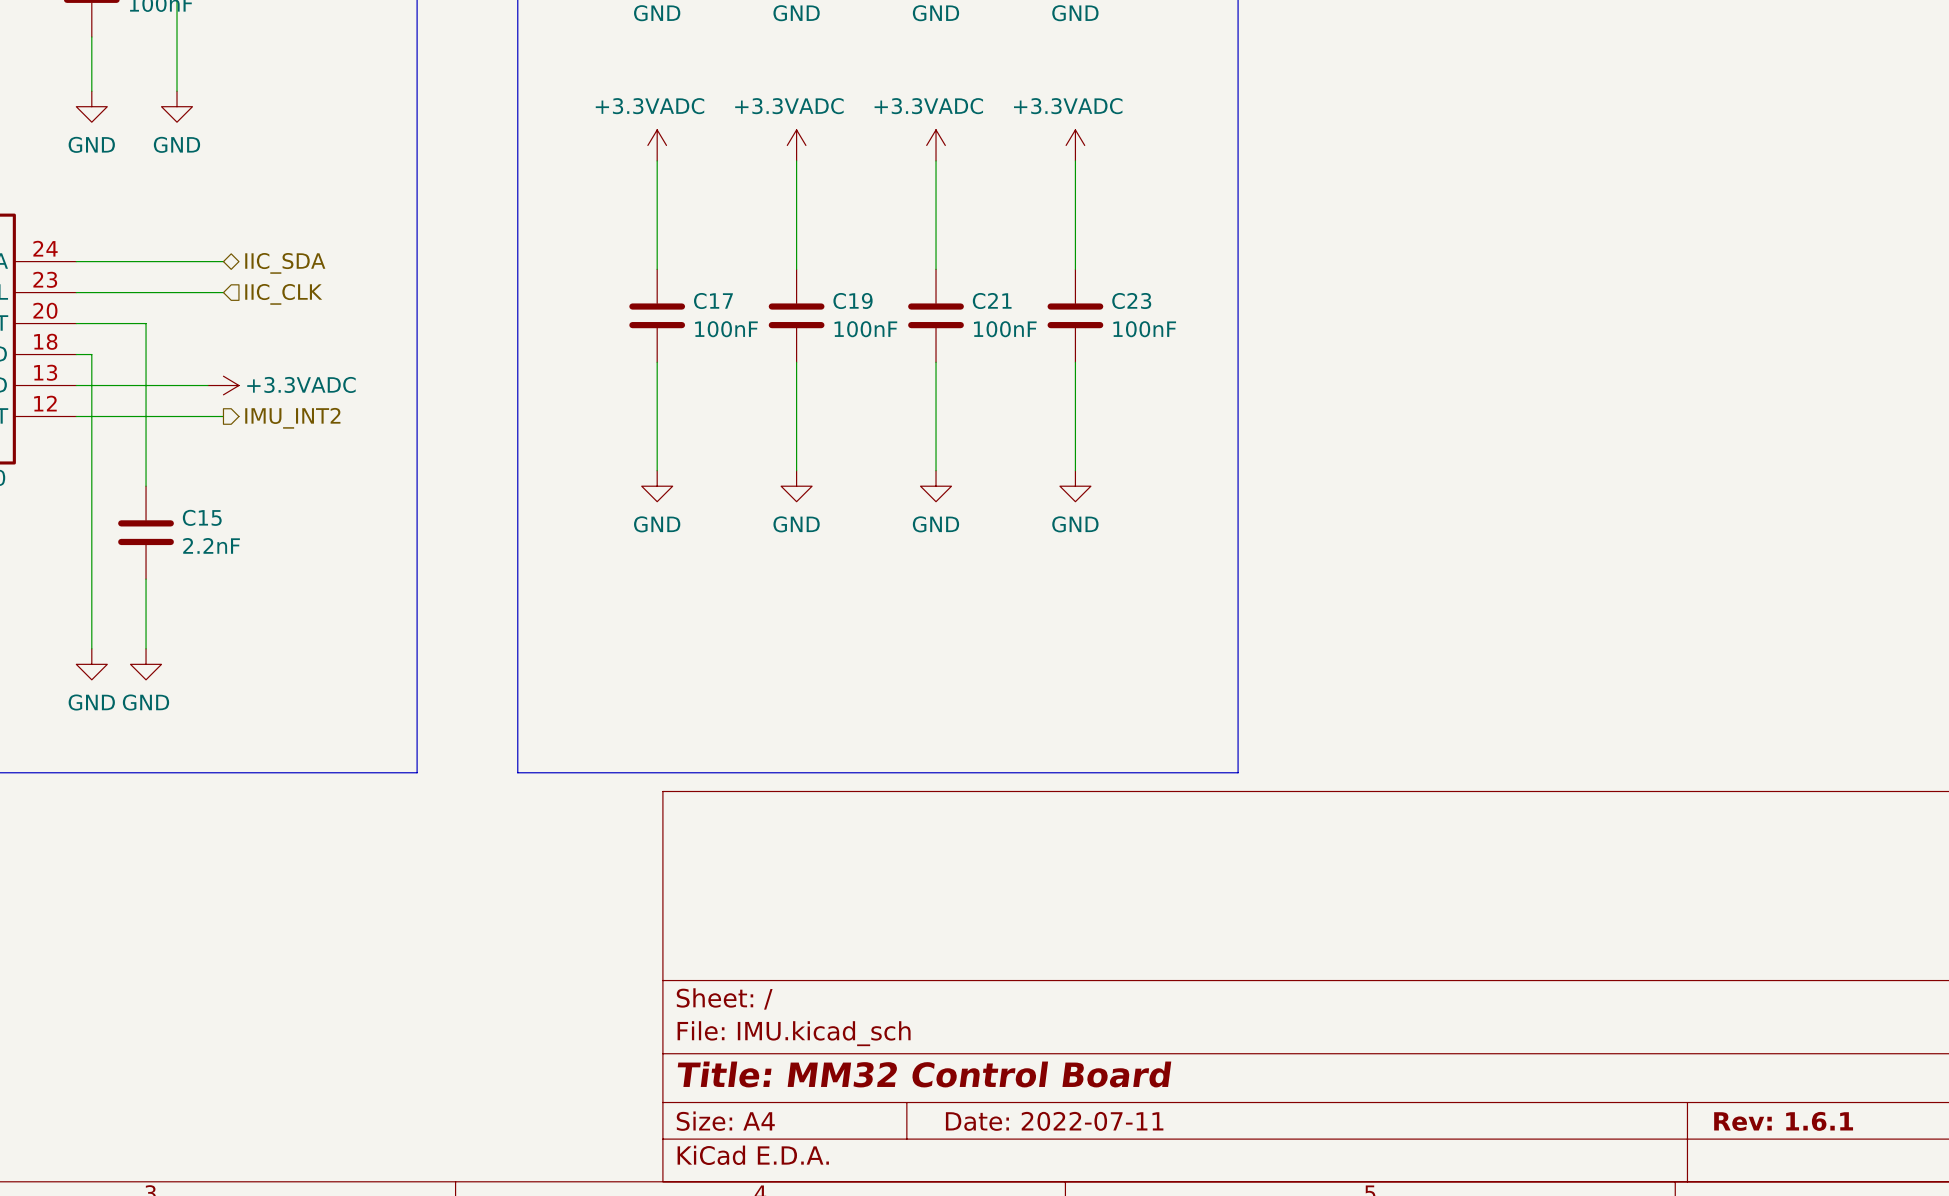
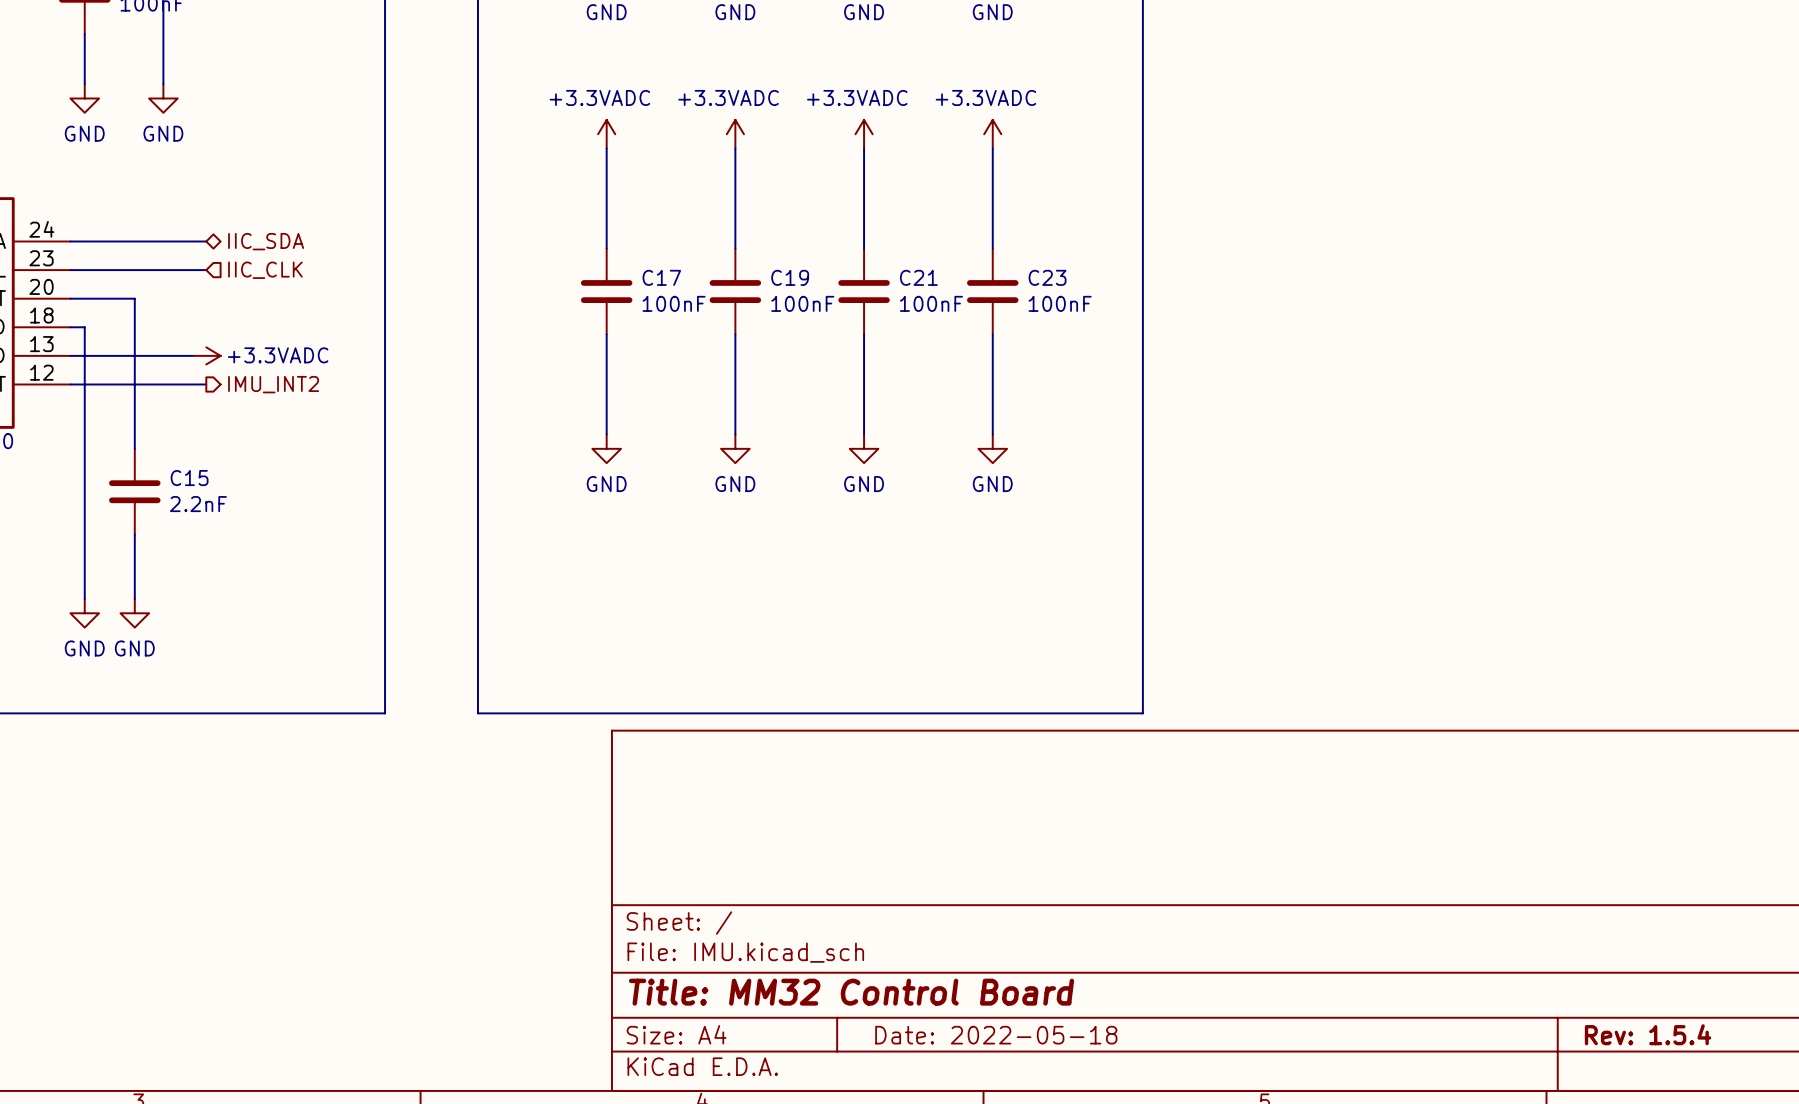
title block: Date: 2022-07-11 (1054, 1121) -> Date: 2022-05-18 (996, 1035)
title block: Rev: 1.6.1 (1783, 1121) -> Rev: 1.5.4 (1648, 1034)

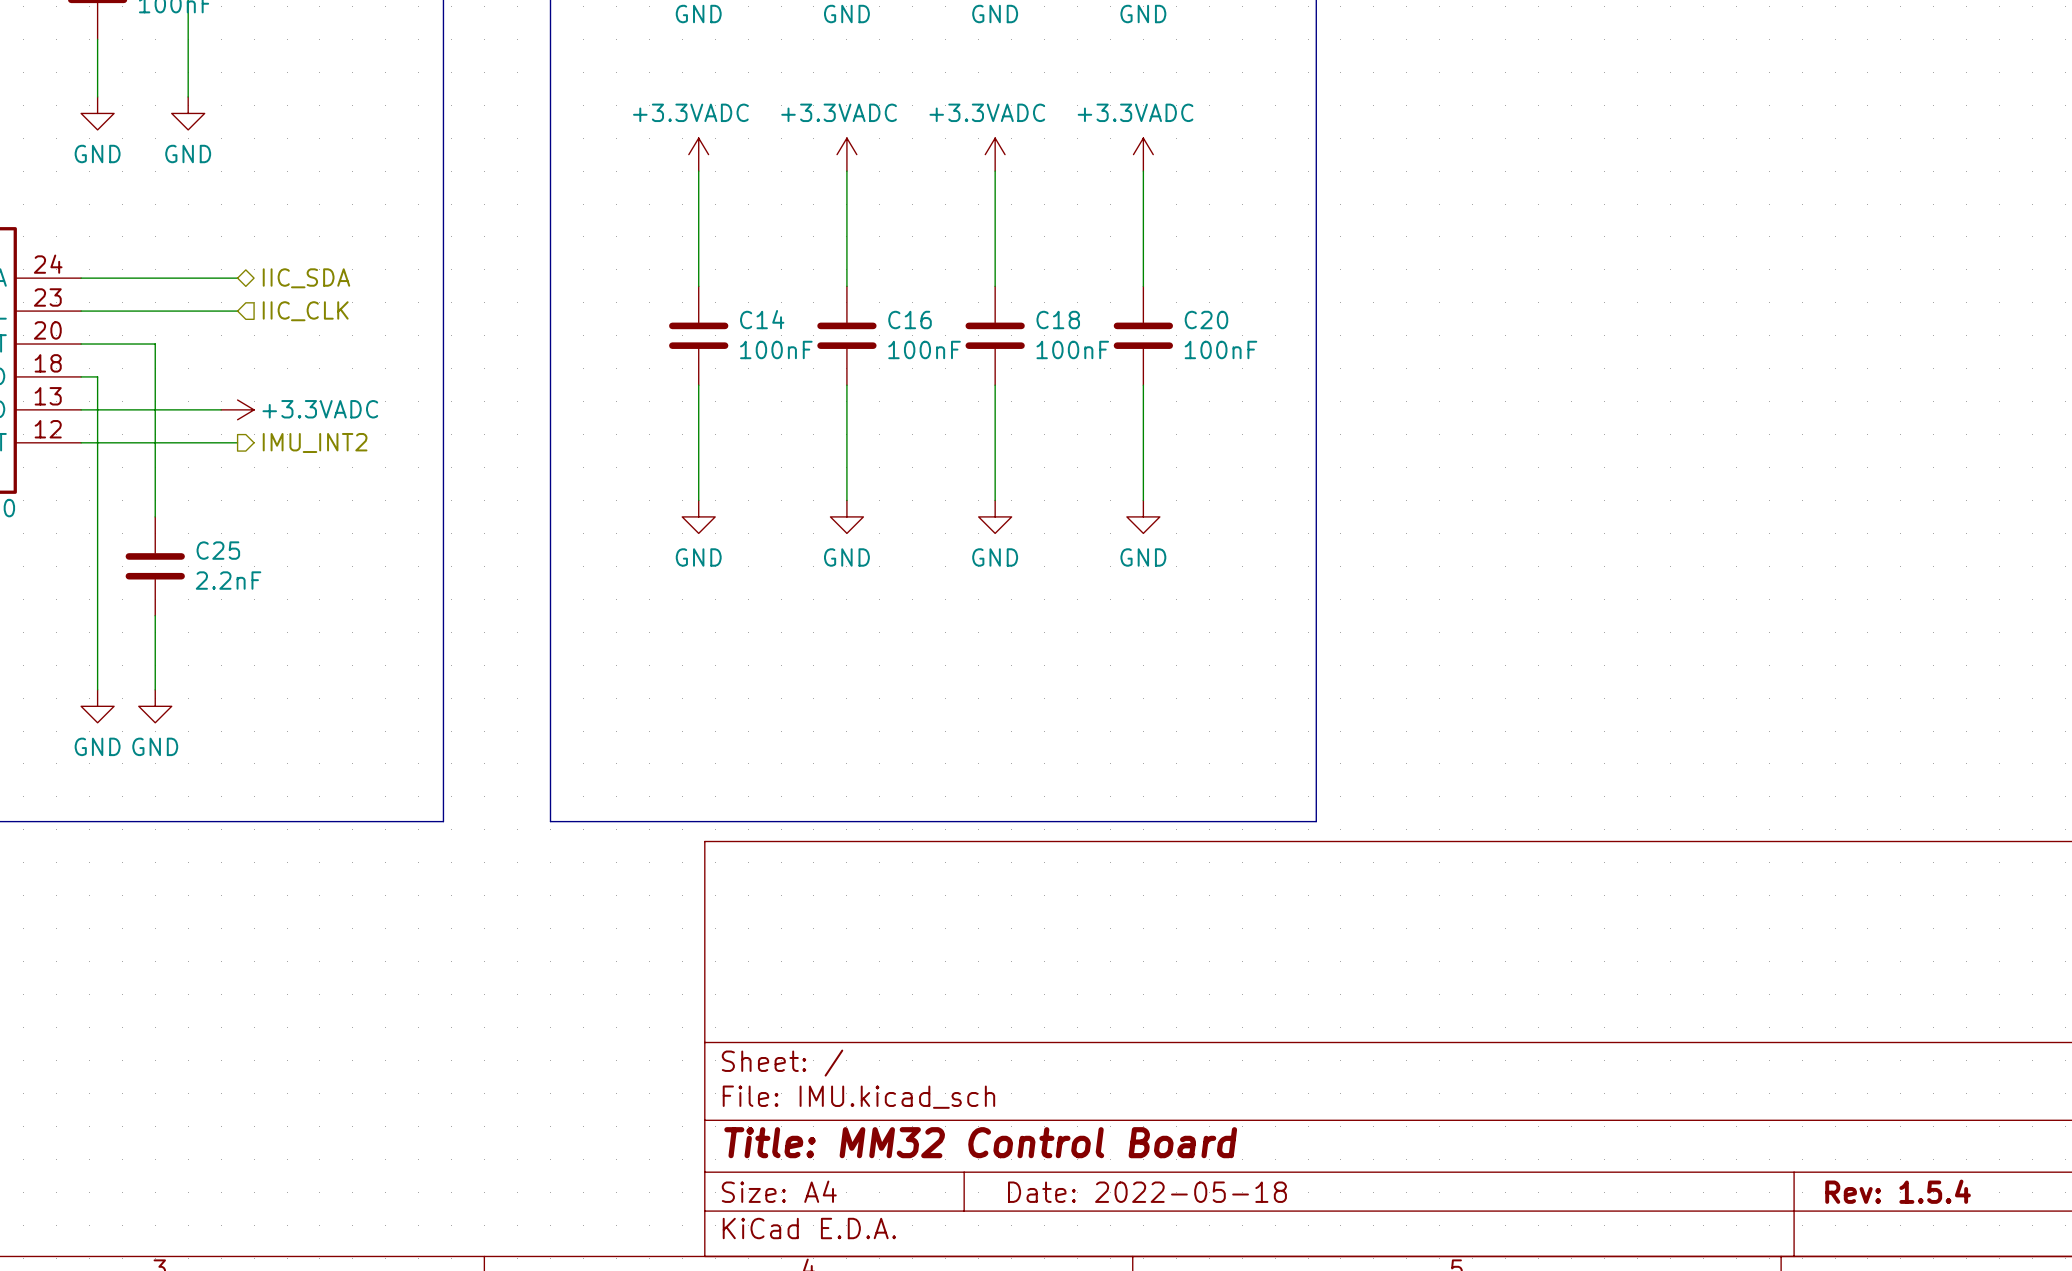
C17 name: C17 (661, 277) -> C14 (762, 319)
C19 name: C19 (790, 277) -> C16 (910, 320)
C21 name: C21 (918, 277) -> C18 (1058, 320)
C23 name: C23 (1047, 277) -> C20 (1206, 320)
C15 name: C15 (189, 478) -> C25 (218, 550)

